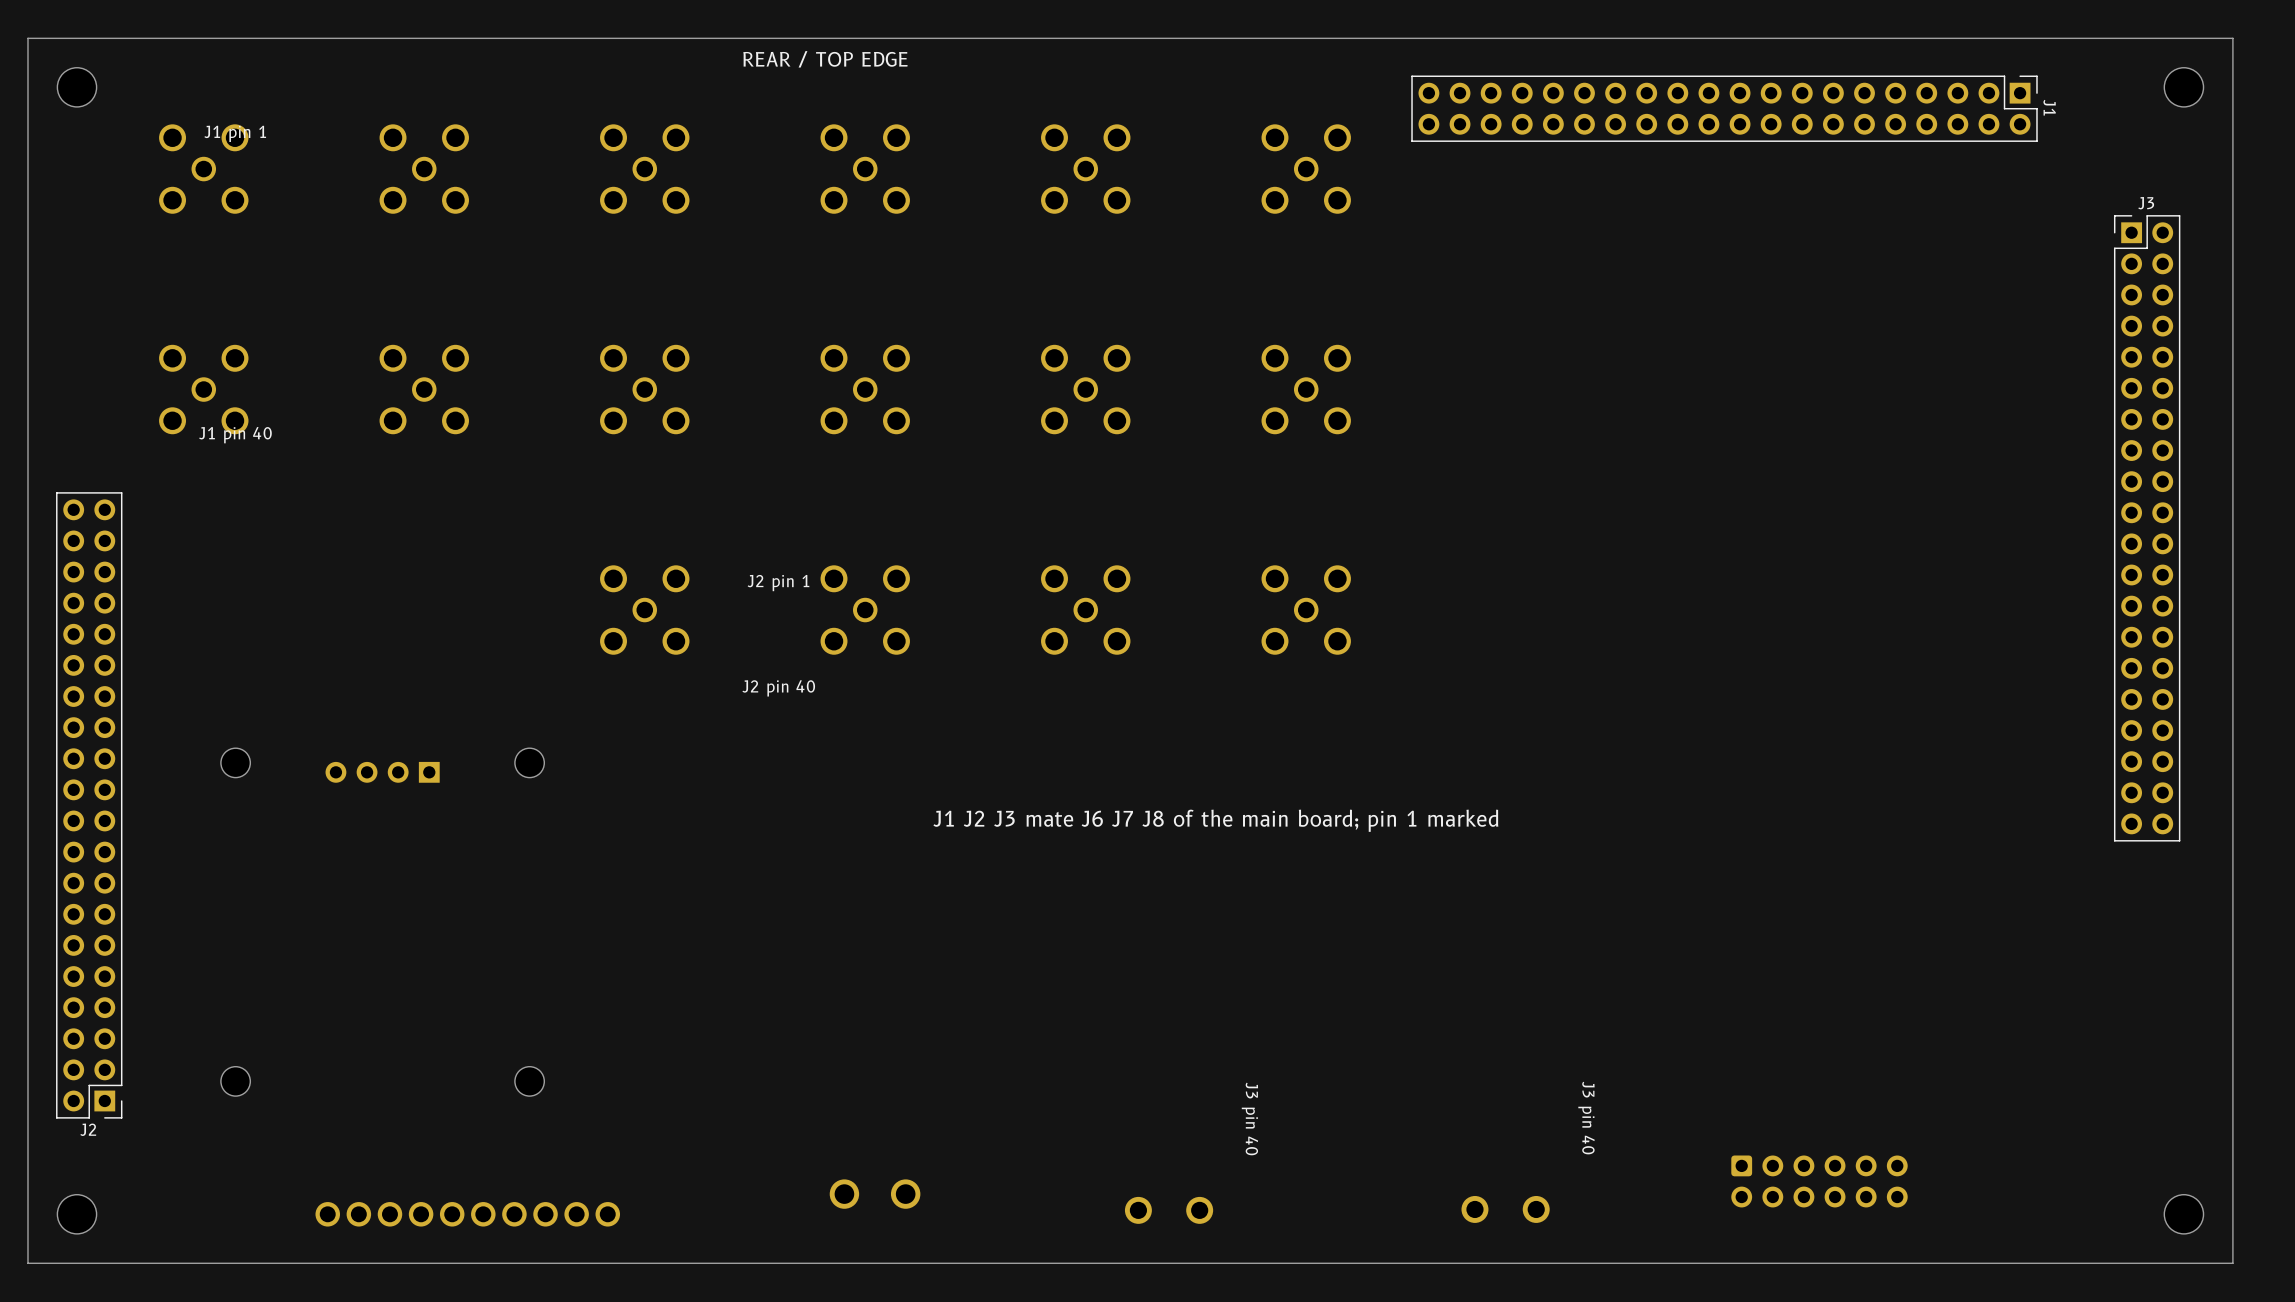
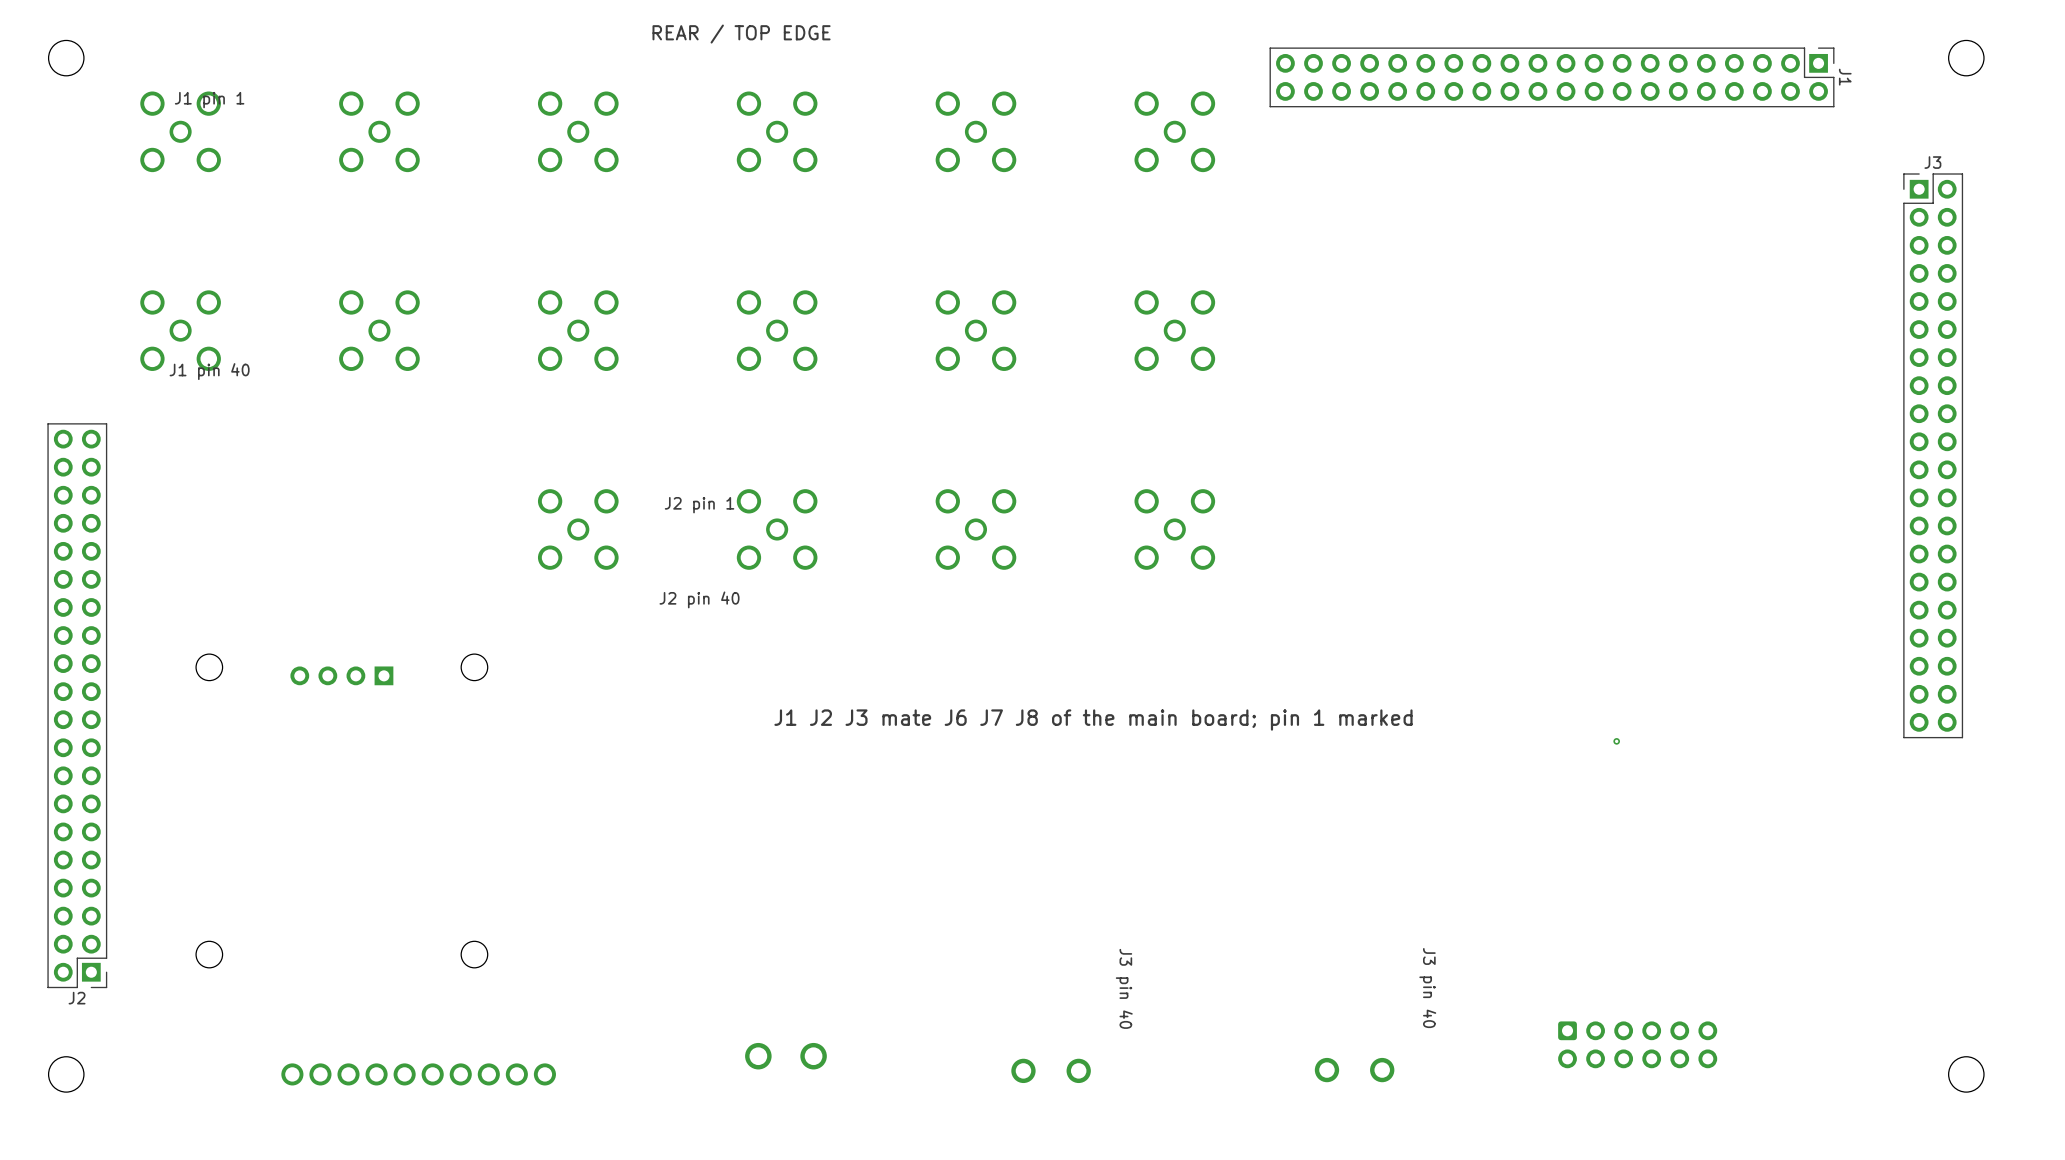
board edge: (2232, 38) (27, 38) (27, 1263) (2232, 1263) (2232, 38) -> none
via: none -> (1616, 741)

